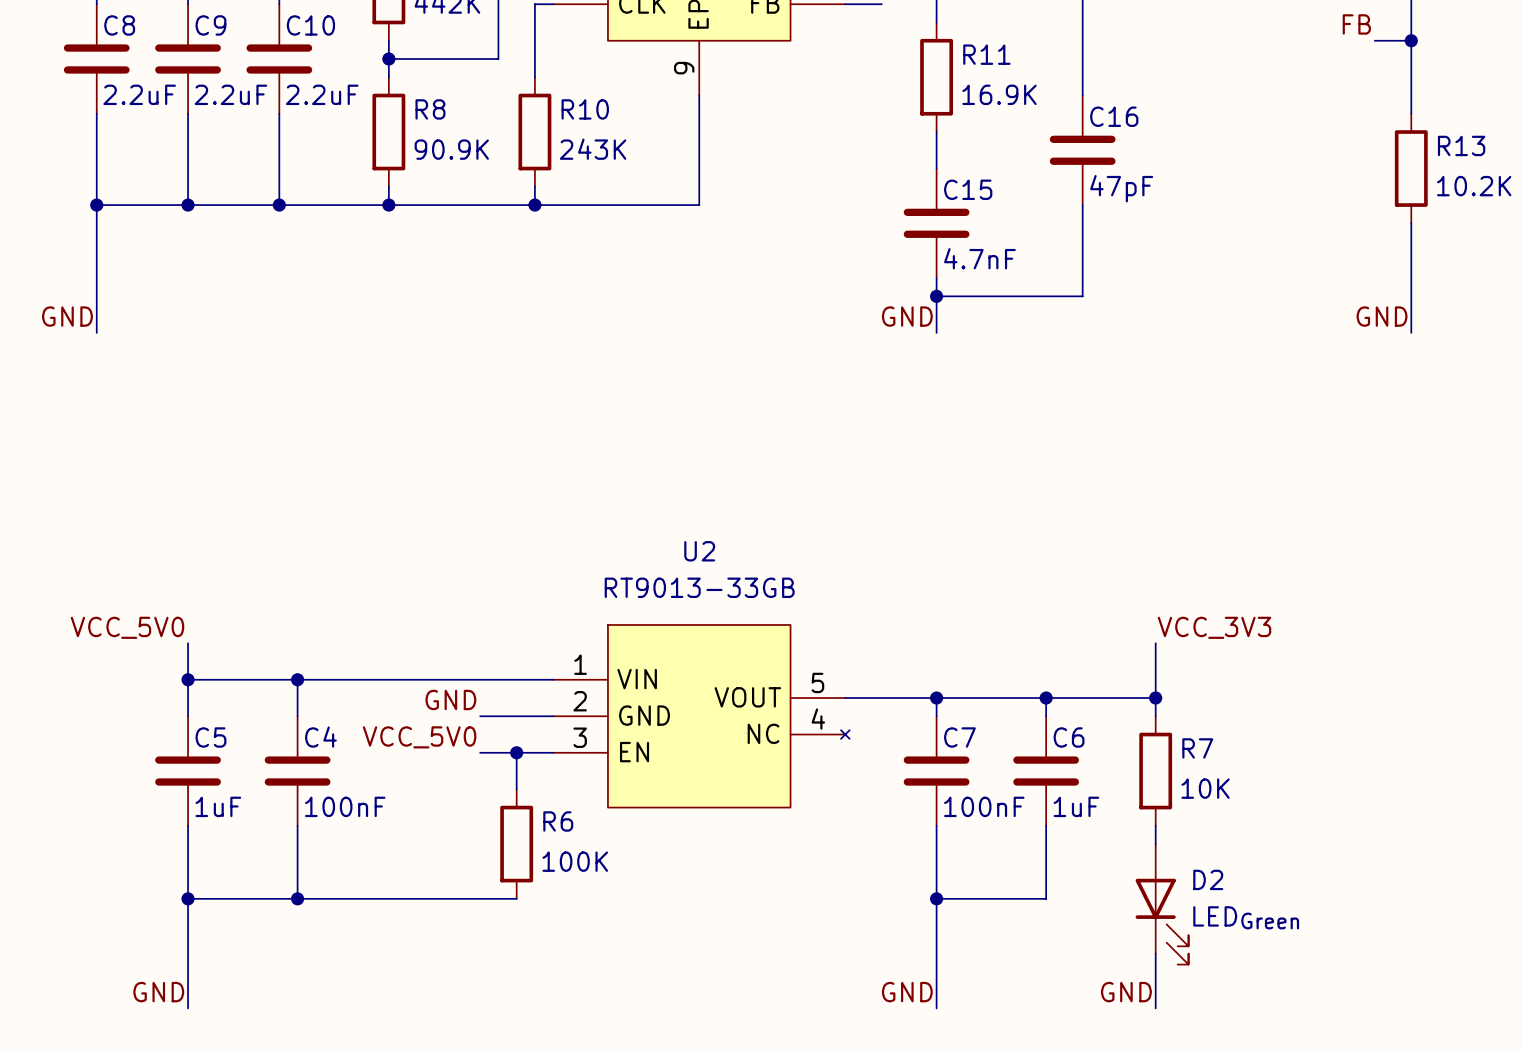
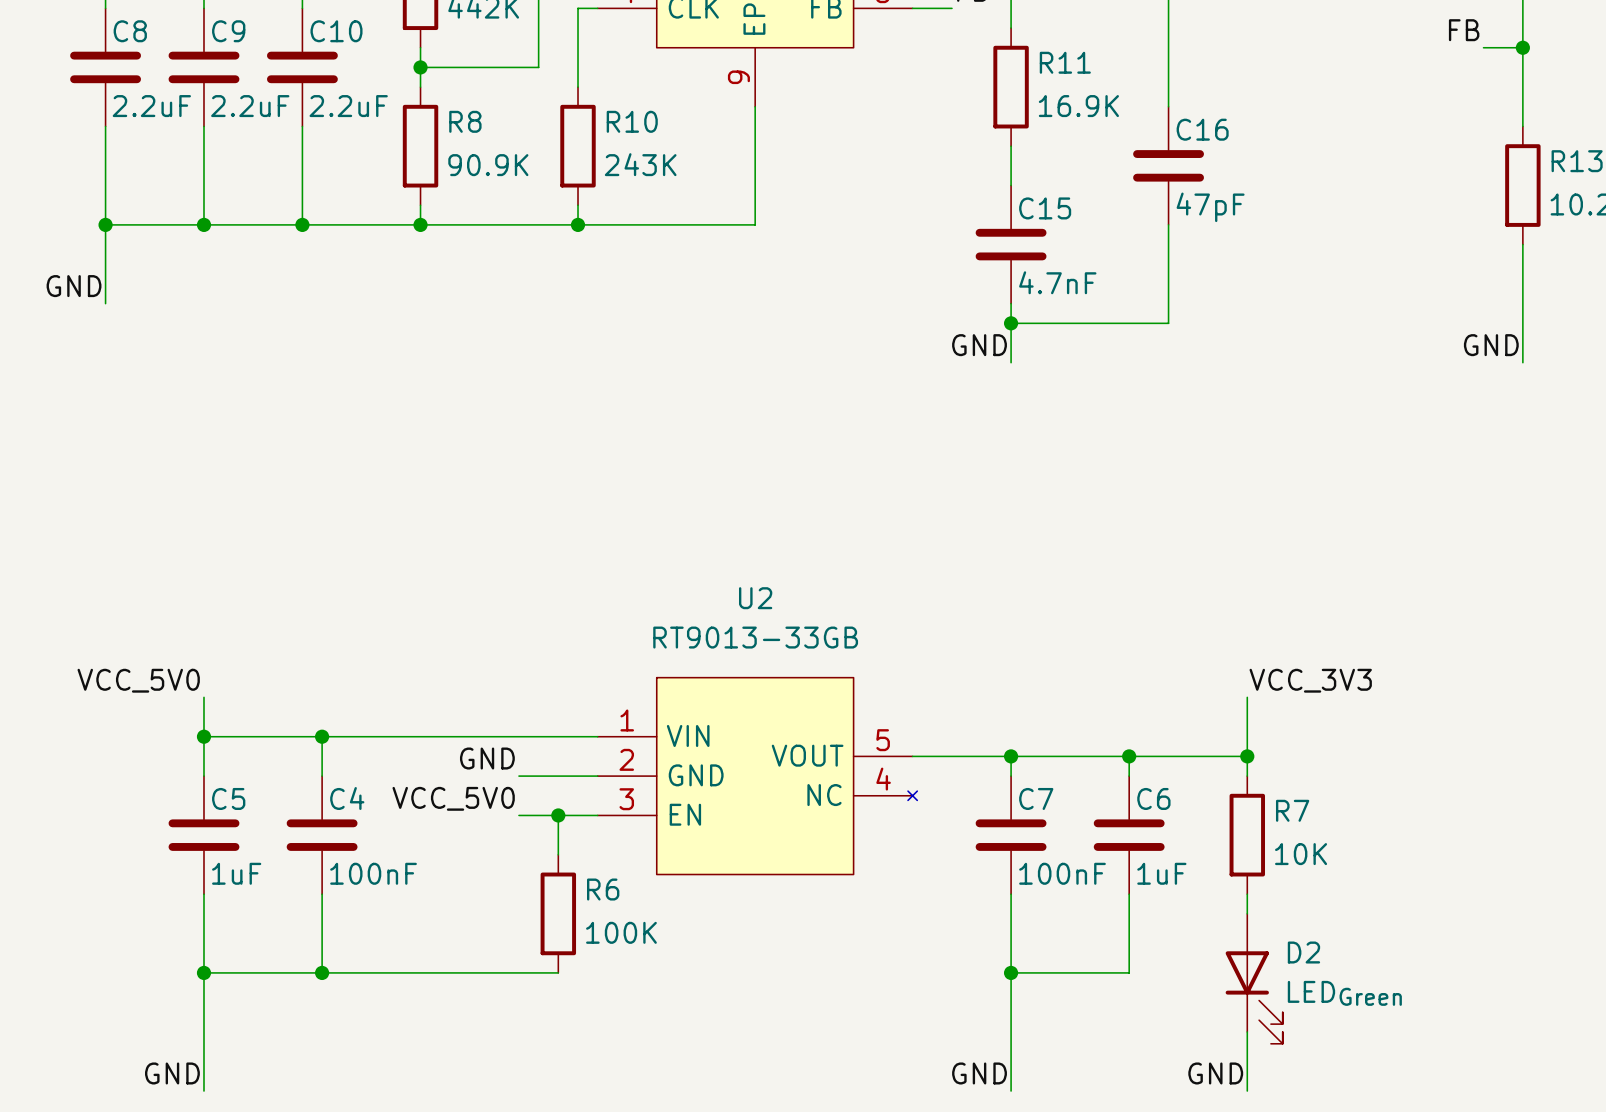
wire: (96, 278) (96, 332) -> none
label position: GND (67, 316) -> GND (74, 286)

